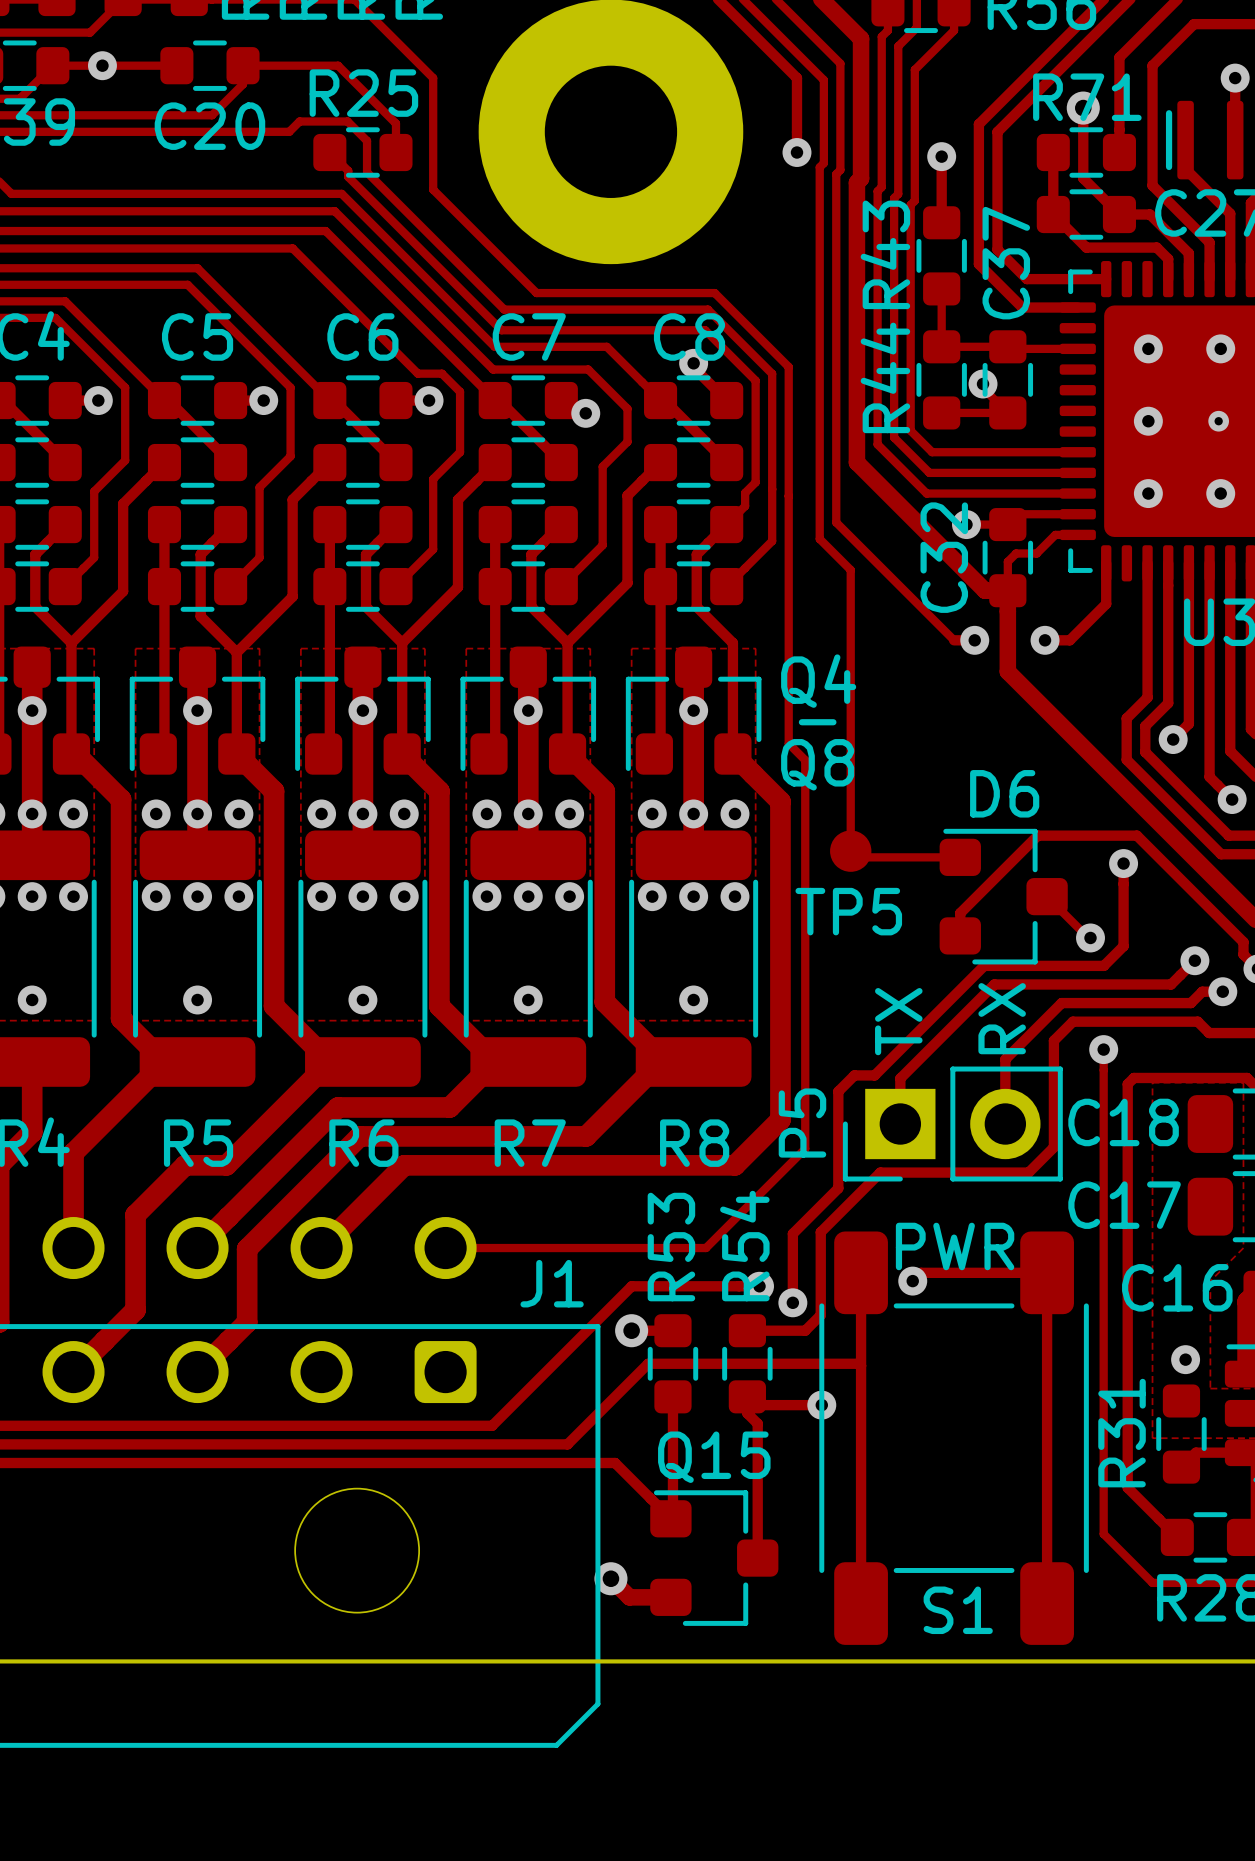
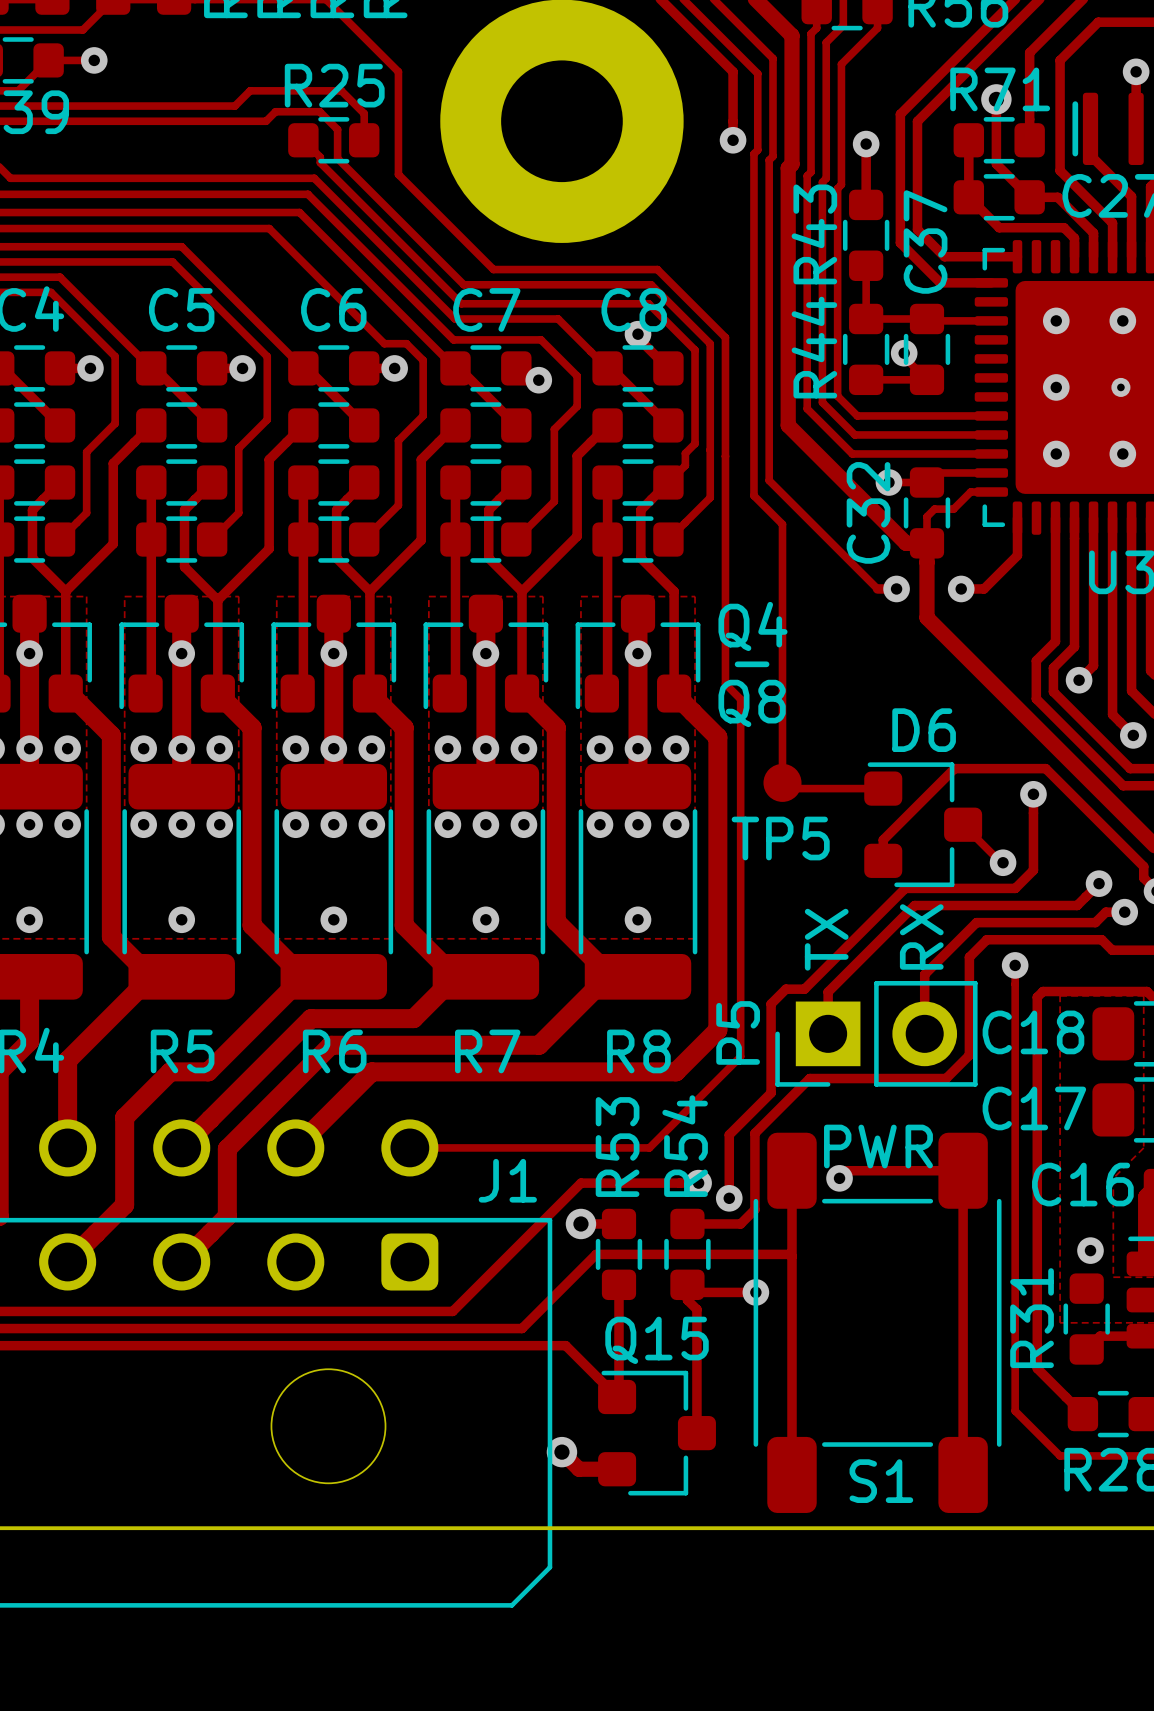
track: (102, 65) (176, 65) -> none
C20: (209, 65) -> none
track: (371, 98) (338, 65) (243, 65) (243, 84) (212, 115) -> (341, 90) (250, 90) (234, 106) (195, 106)

